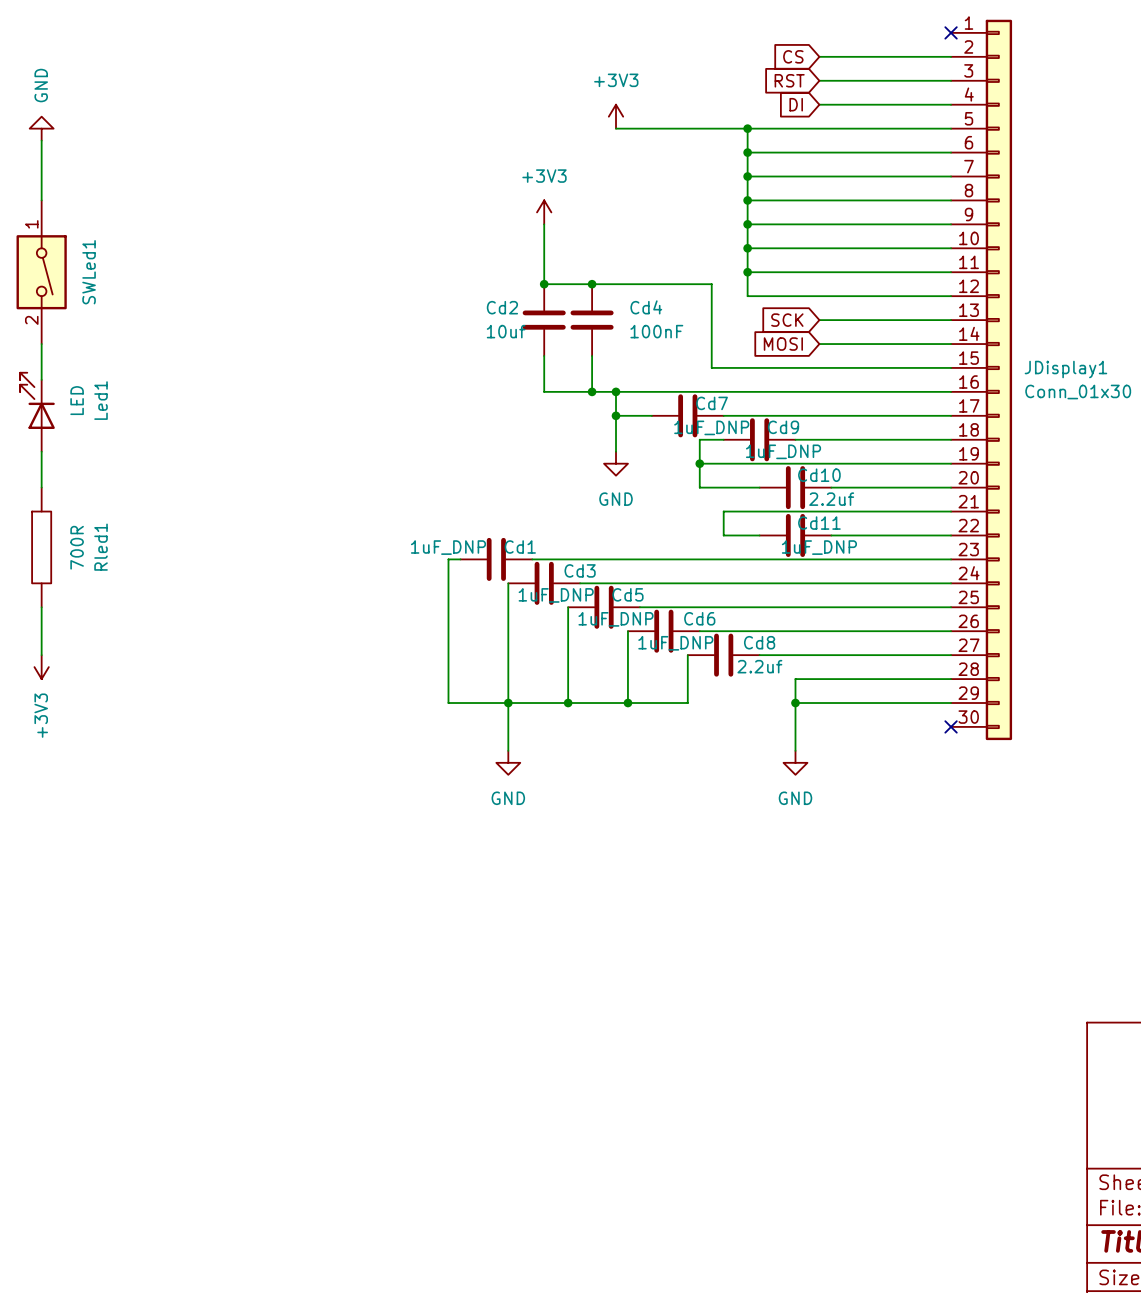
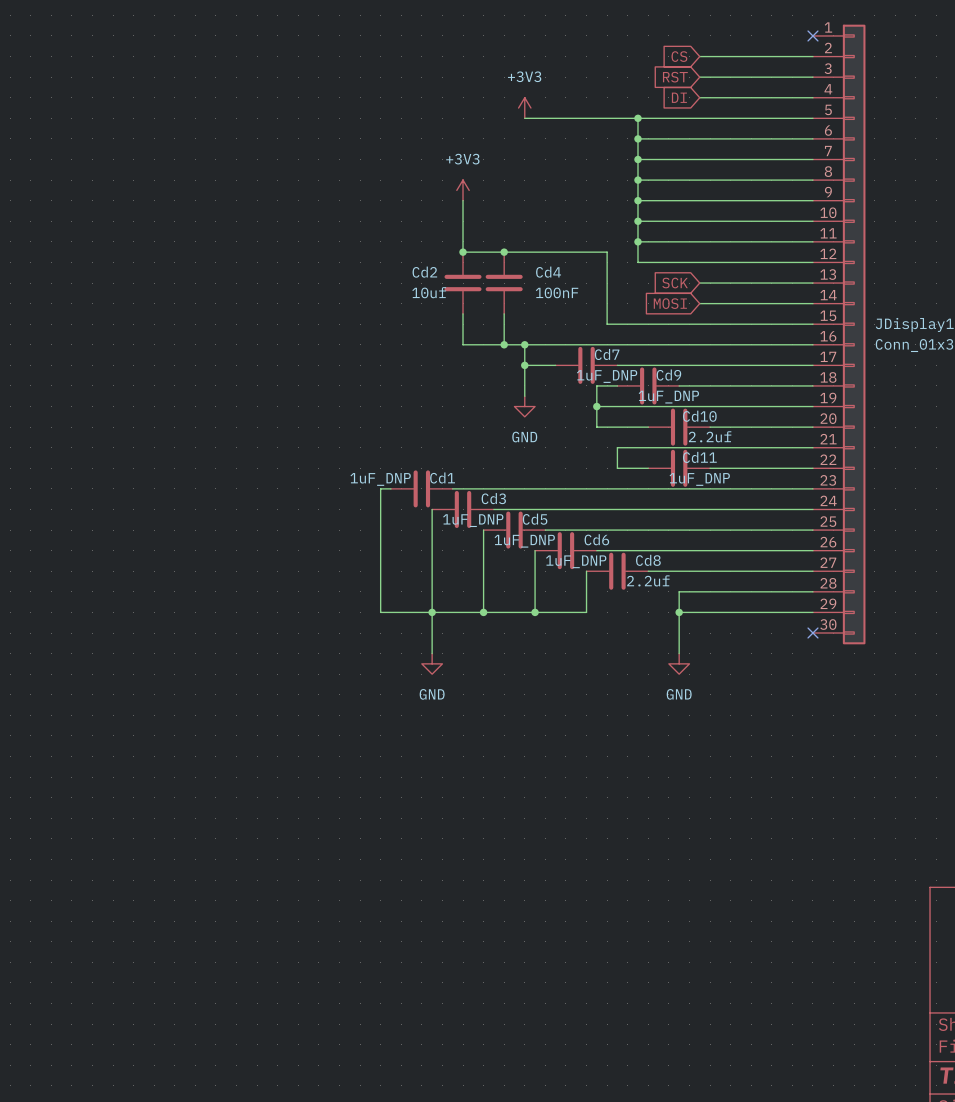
power symbol: GND (41, 128) -> none
wire: (41, 140) (41, 200) -> none
SWLed1: (41, 272) -> none
wire: (41, 344) (41, 379) -> none
Led1: LED (37, 412) -> none
wire: (41, 451) (41, 487) -> none
Rled1: 700R (41, 547) -> none
wire: (41, 607) (41, 655) -> none
power symbol: +3V3 (41, 667) -> none

